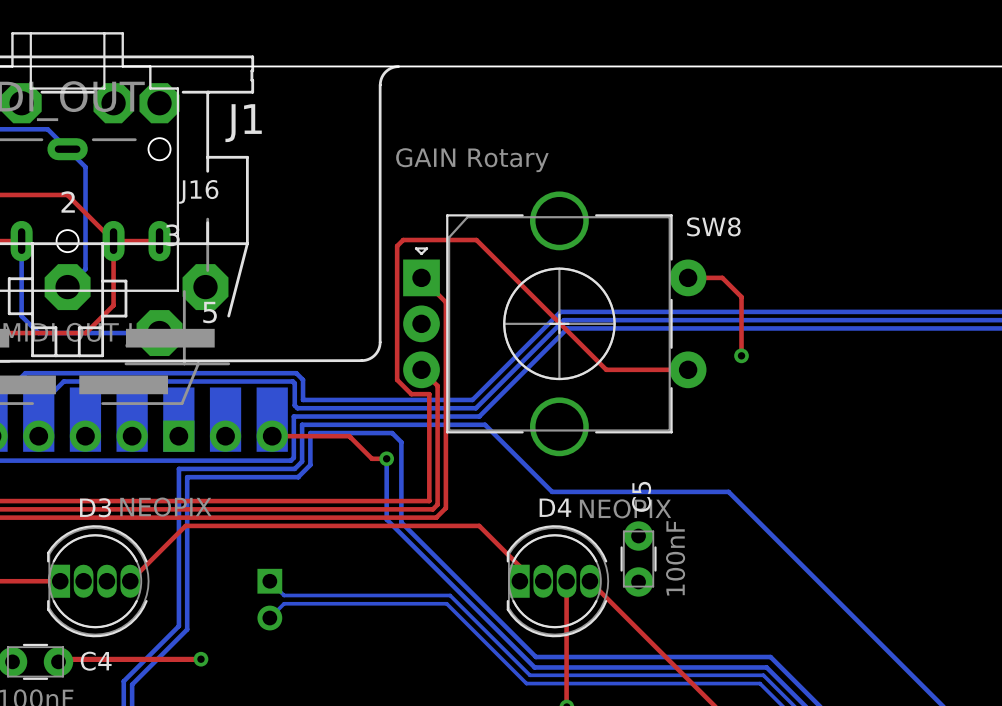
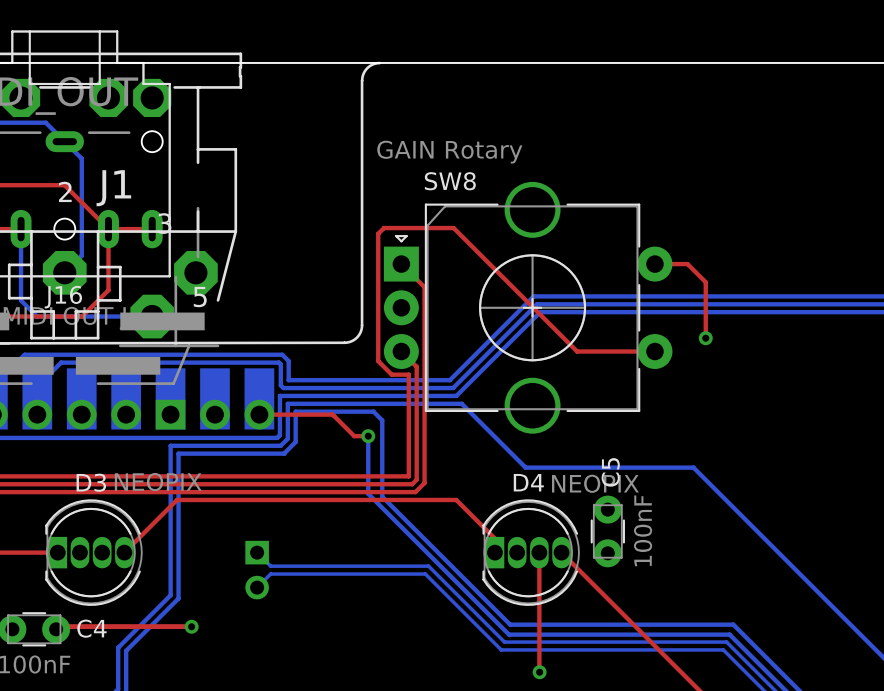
J1 name position: J1 (243, 123) -> J1 (113, 188)
J16 name position: J16 (198, 191) -> J16 (63, 297)
SW8 name position: SW8 (713, 226) -> SW8 (450, 181)

